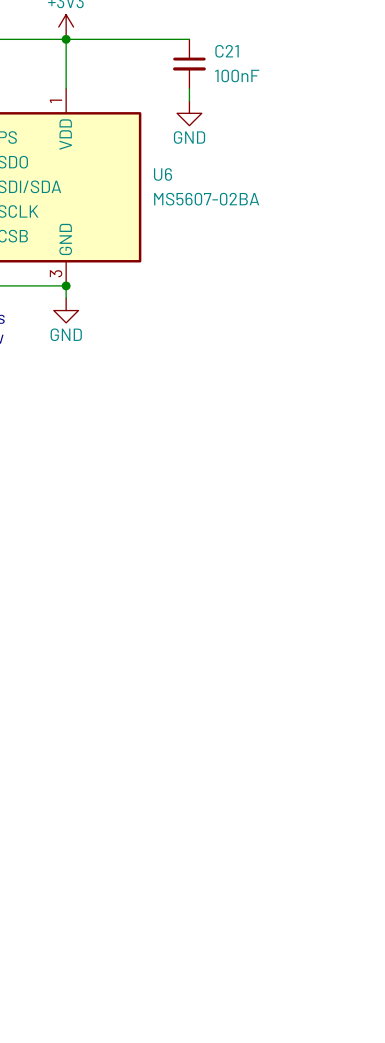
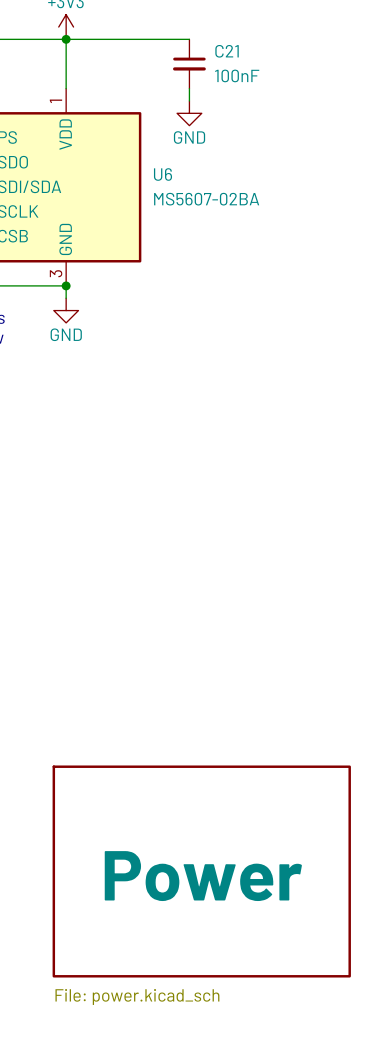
sheet Power: none -> File: power.kicad_sch (201, 871)

